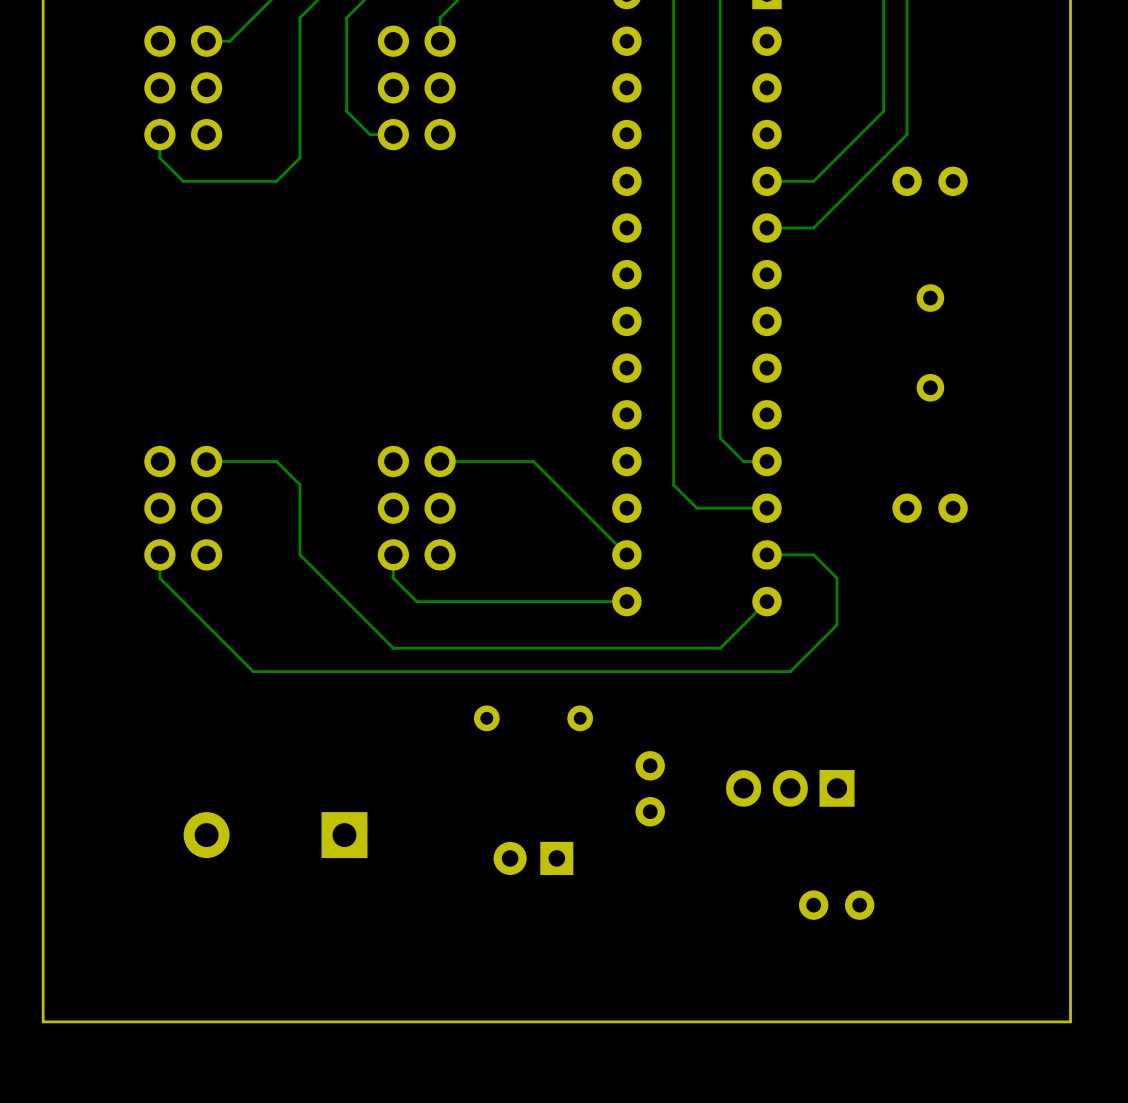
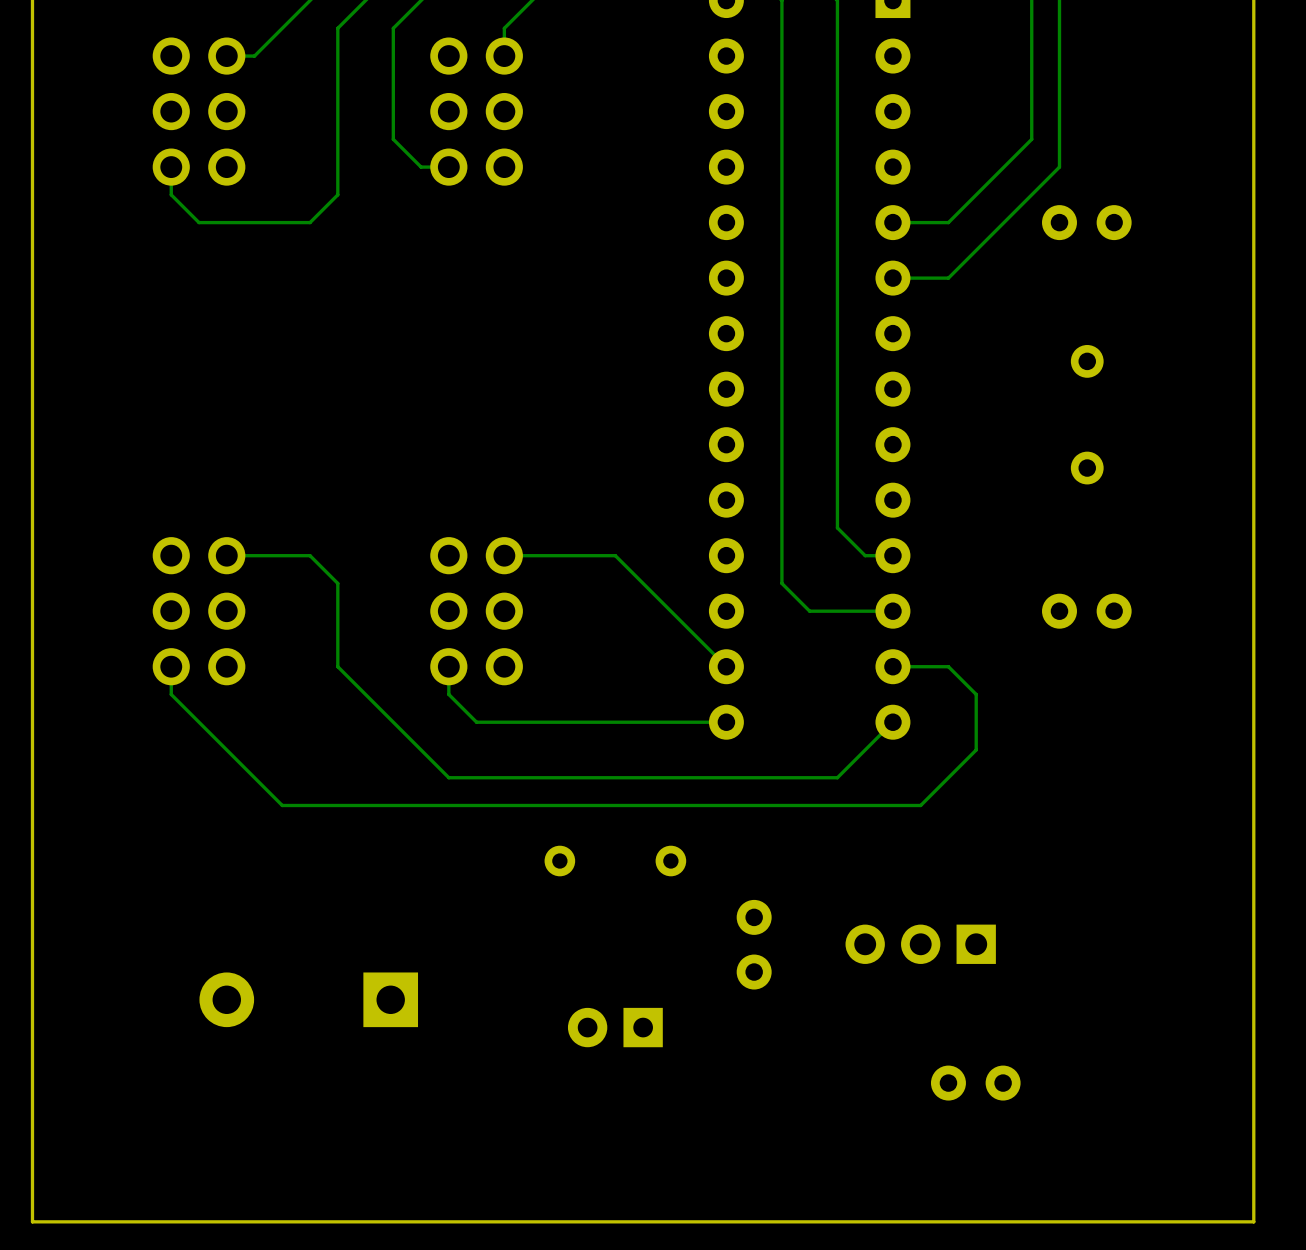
part footprint: [726, 770, 855, 807] -> [845, 924, 996, 964]

